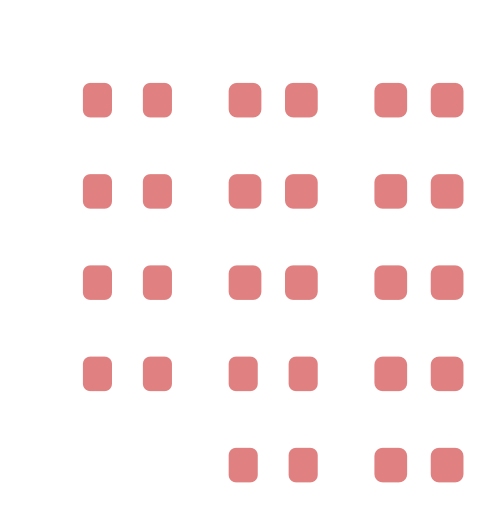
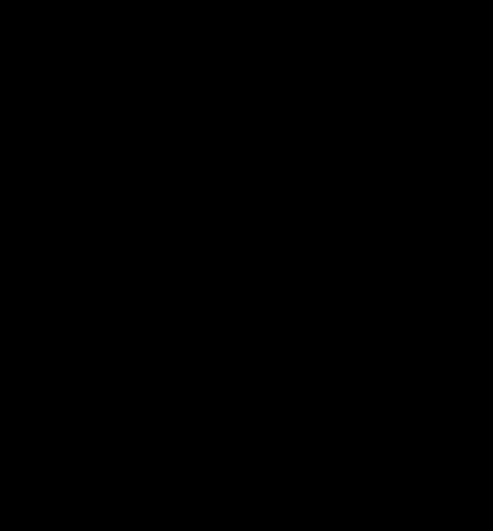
part: (127, 100) -> none
part: (273, 100) -> none
part: (418, 100) -> none
part: (127, 191) -> none
part: (273, 191) -> none
part: (418, 191) -> none
part: (127, 282) -> none
part: (273, 282) -> none
part: (418, 282) -> none
part: (127, 373) -> none
part: (273, 373) -> none
part: (418, 373) -> none
part: (273, 465) -> none
part: (418, 465) -> none

